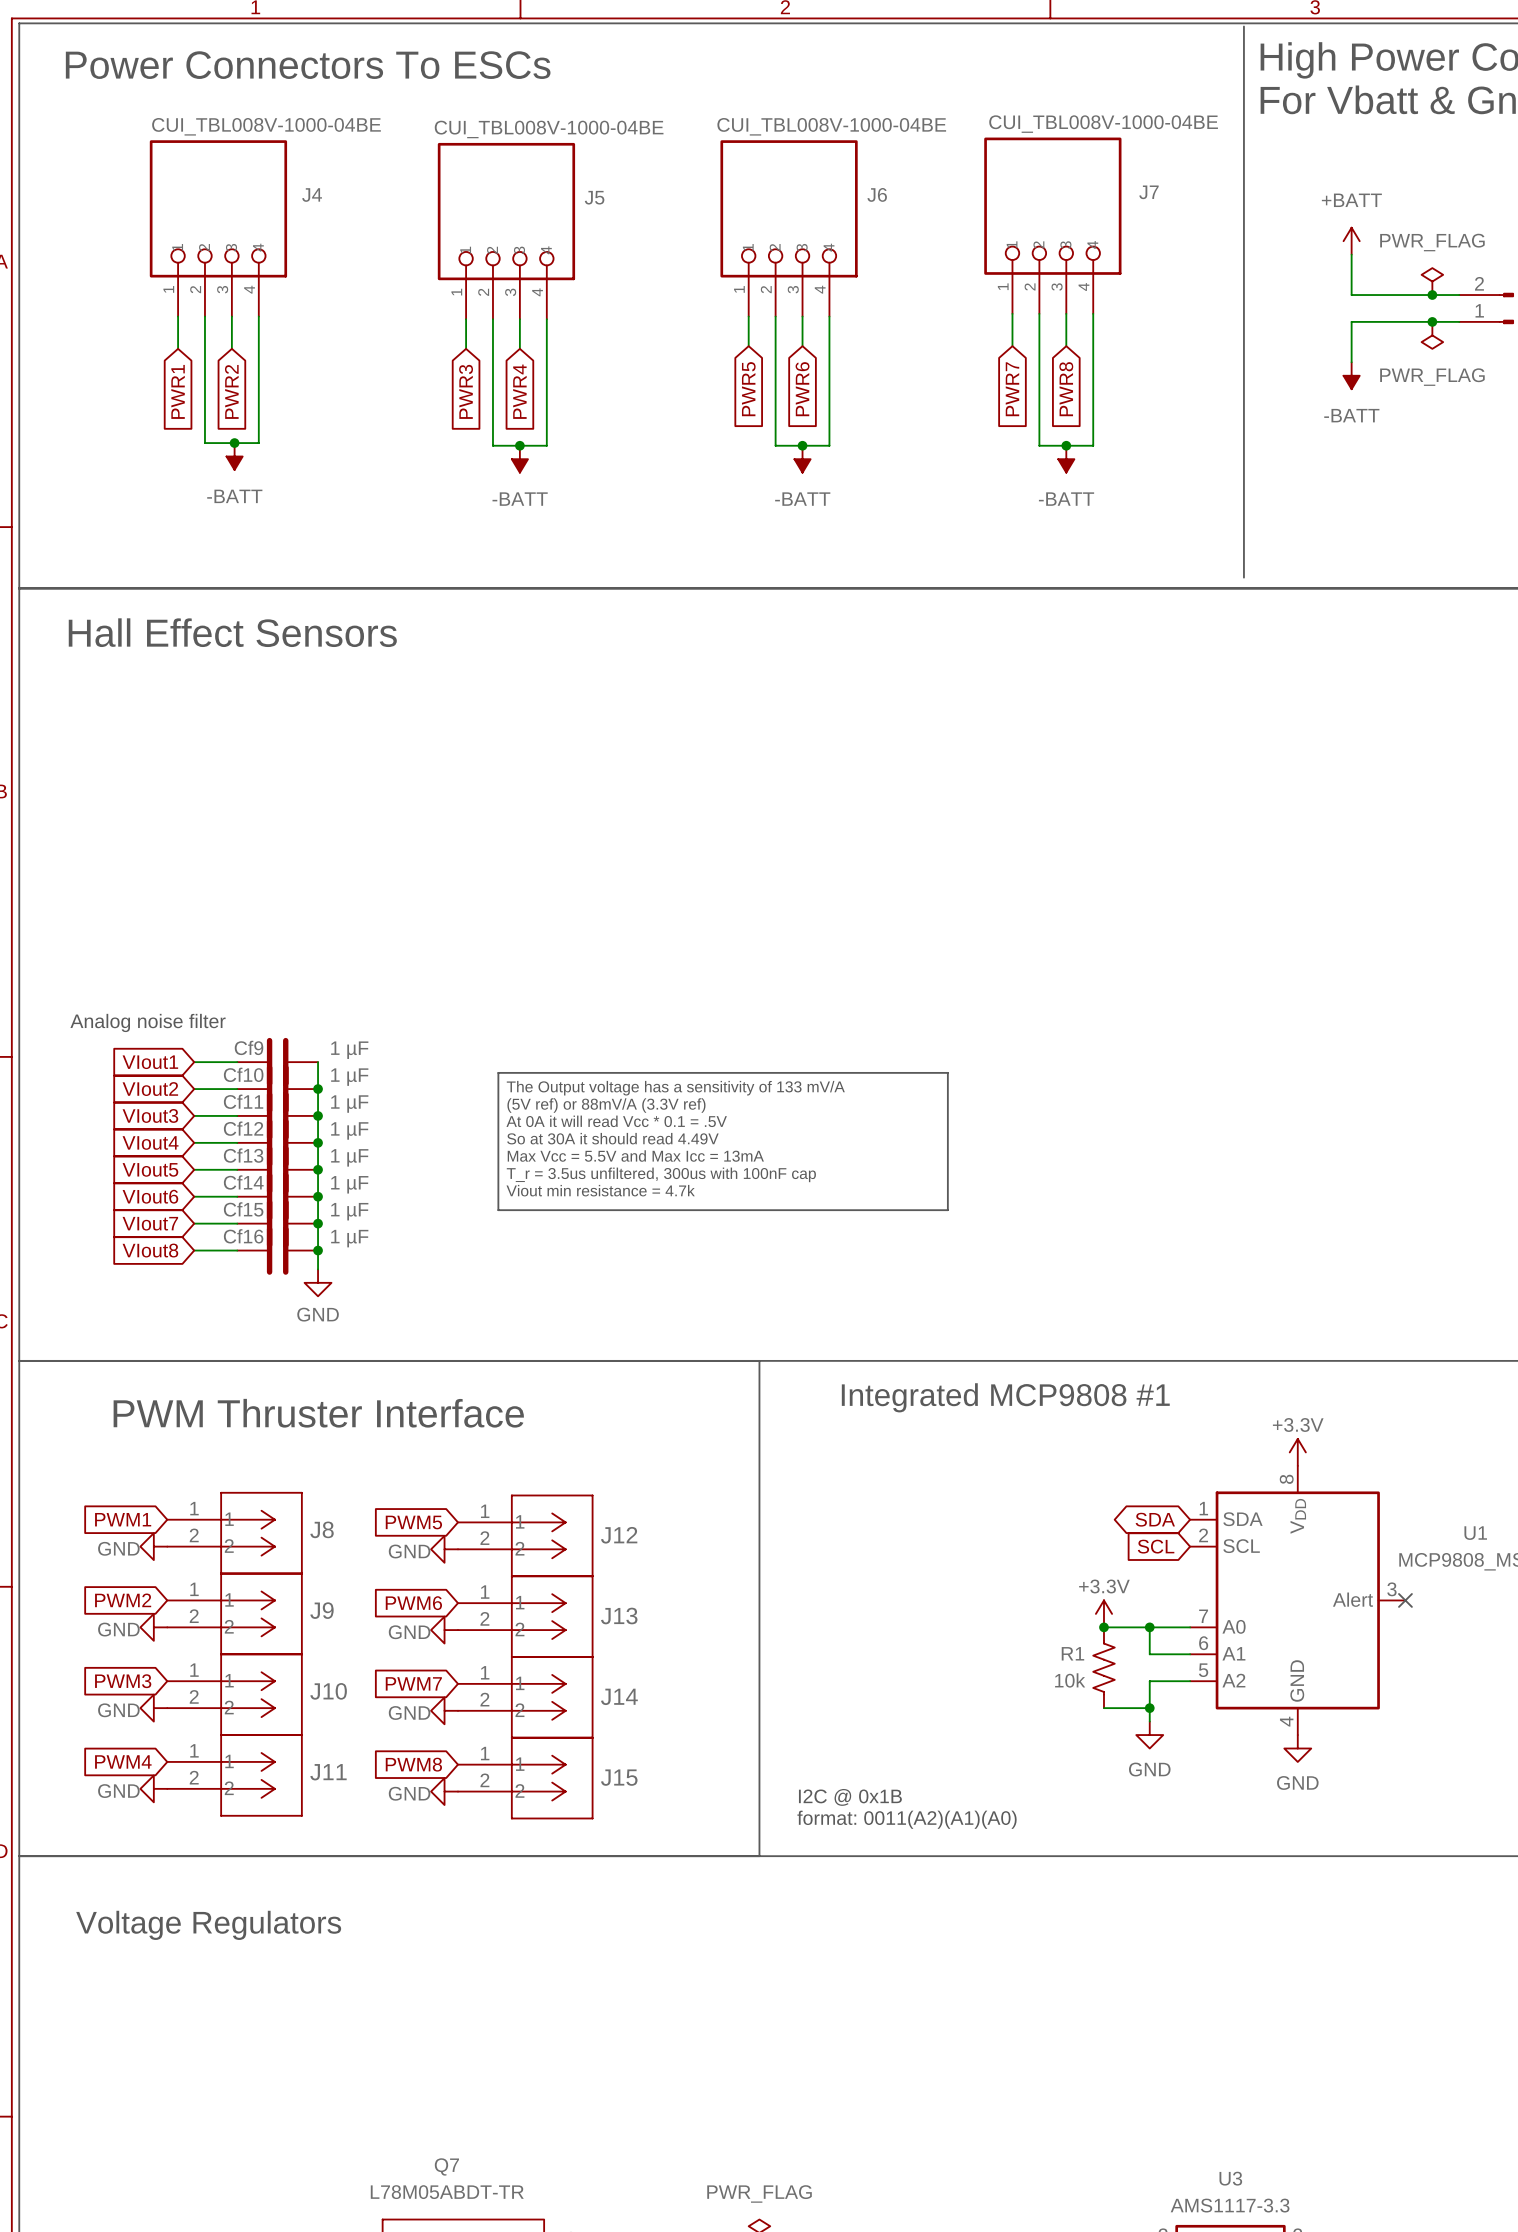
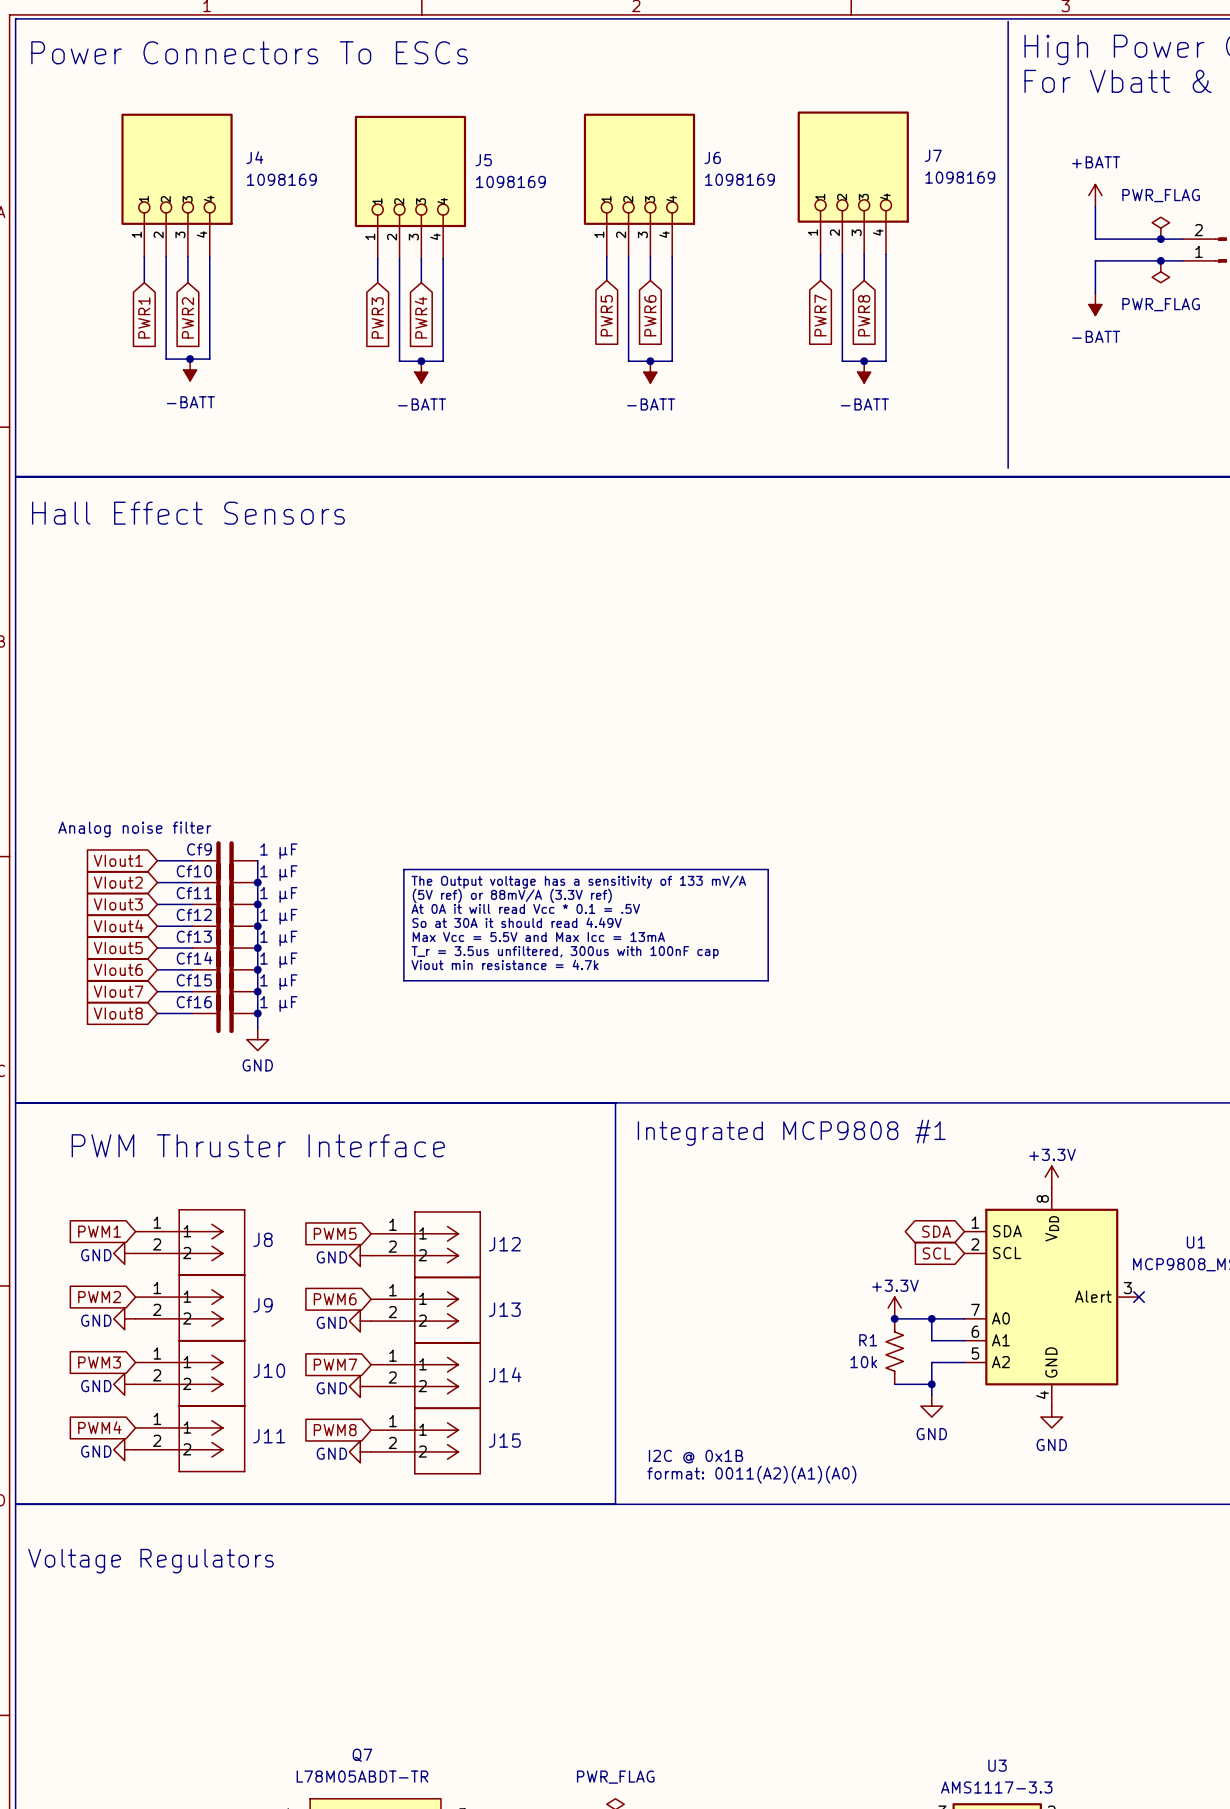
J7 value: CUI_TBL008V-1000-04BE (1103, 124) -> 1098169 (960, 177)
J4 value: CUI_TBL008V-1000-04BE (266, 126) -> 1098169 (281, 179)
J6 value: CUI_TBL008V-1000-04BE (831, 126) -> 1098169 (739, 179)
J5 value: CUI_TBL008V-1000-04BE (549, 129) -> 1098169 (510, 181)

